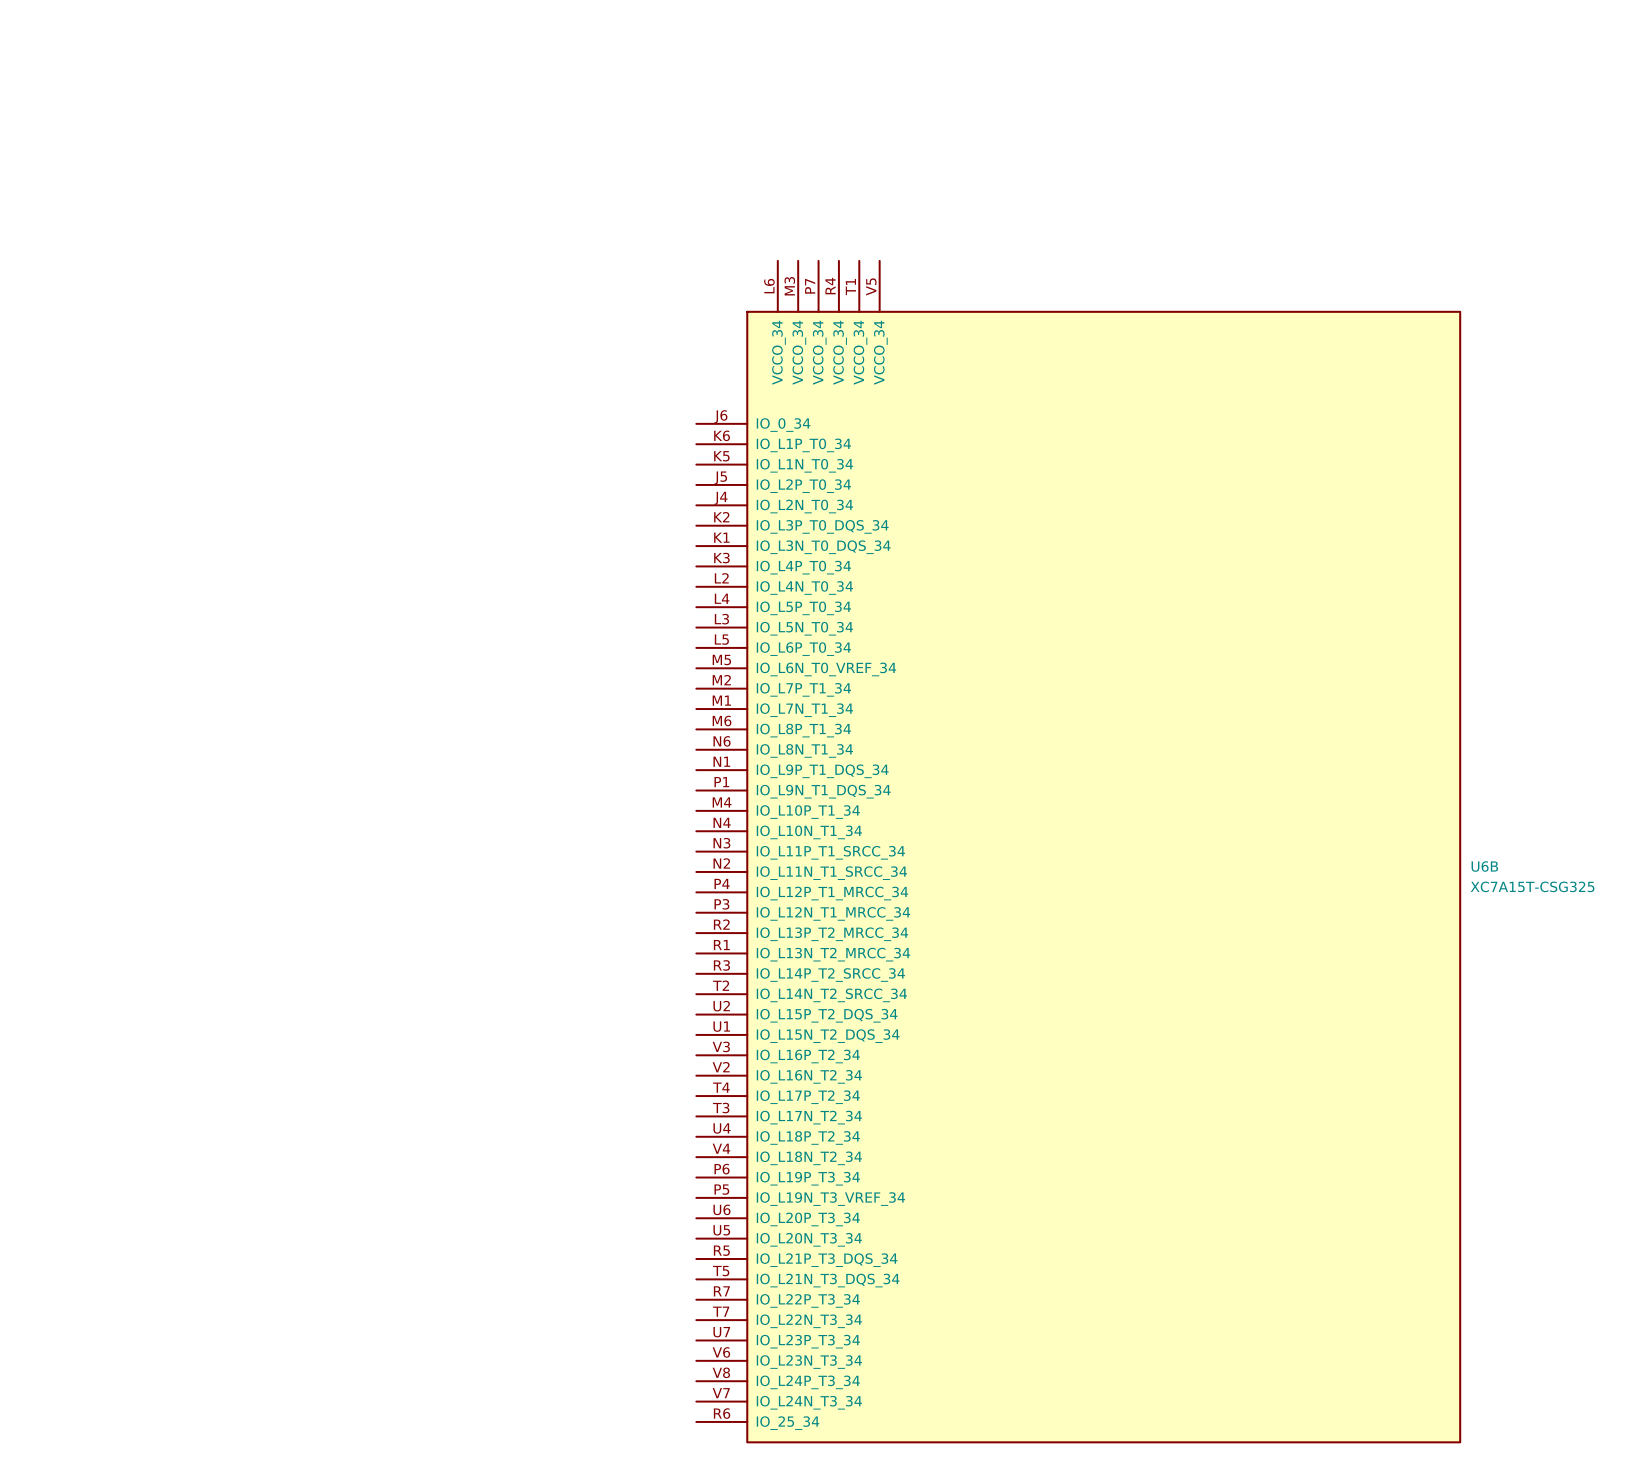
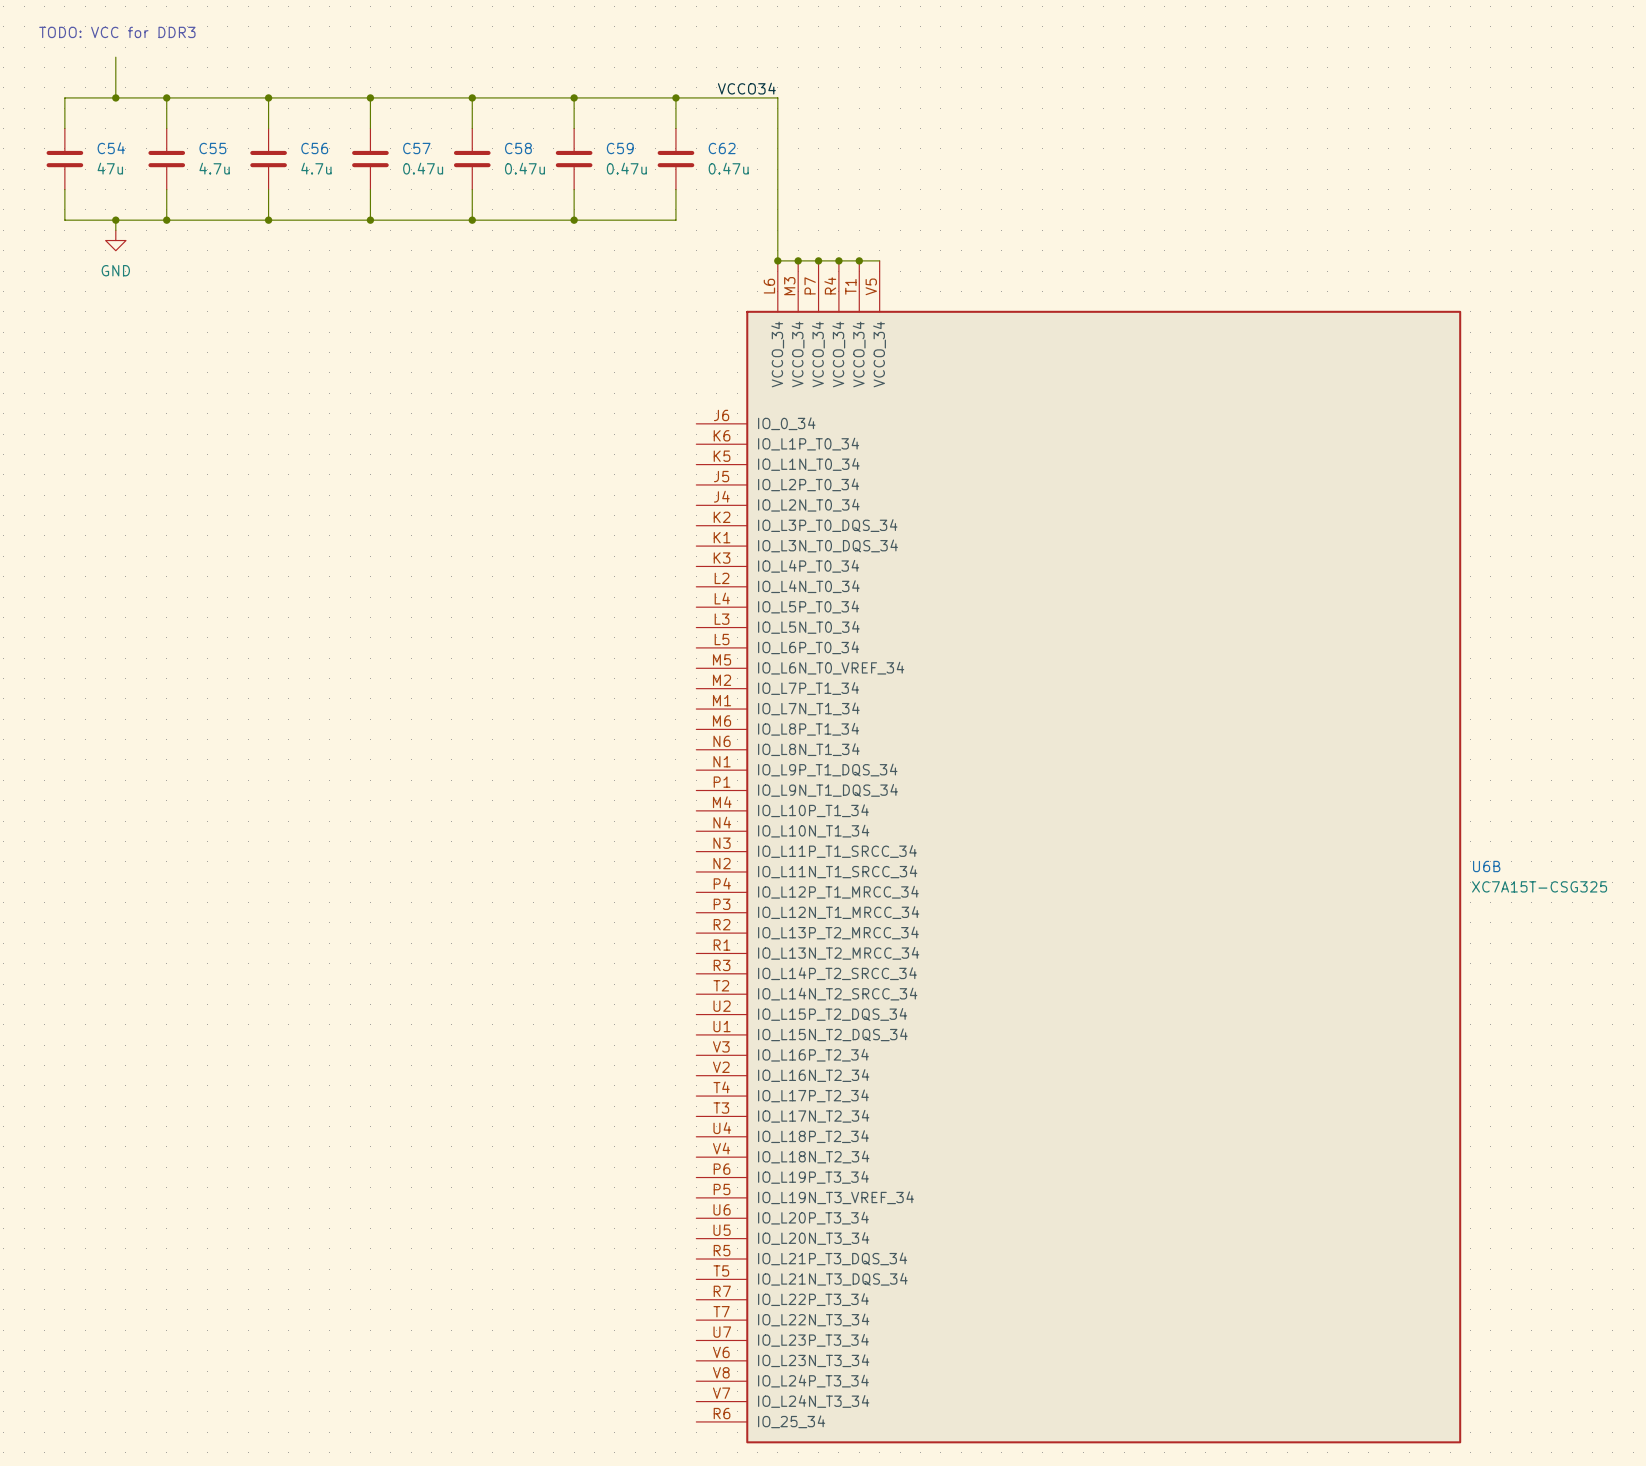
text: none -> TODO: VCC for DDR3 (117, 32)
wire: none -> (115, 57) (115, 97)
label: none -> VCCO34 (746, 88)
junction: none -> (115, 97)
wire: none -> (166, 97) (166, 128)
junction: none -> (166, 97)
wire: none -> (268, 97) (268, 128)
junction: none -> (268, 97)
wire: none -> (370, 97) (370, 128)
junction: none -> (370, 97)
wire: none -> (472, 97) (472, 128)
junction: none -> (472, 97)
wire: none -> (574, 97) (574, 128)
junction: none -> (574, 97)
wire: none -> (675, 97) (675, 128)
junction: none -> (675, 97)
wire: none -> (64, 128) (64, 97) (777, 97) (777, 260) (879, 260)
C54: none -> 47u (64, 159)
C55: none -> 4.7u (166, 159)
C56: none -> 4.7u (268, 159)
C57: none -> 0.47u (370, 159)
C58: none -> 0.47u (472, 159)
C59: none -> 0.47u (574, 159)
C62: none -> 0.47u (675, 159)
wire: none -> (64, 189) (64, 220) (675, 220) (675, 189)
wire: none -> (166, 189) (166, 220)
wire: none -> (268, 189) (268, 220)
wire: none -> (370, 189) (370, 220)
wire: none -> (472, 189) (472, 220)
wire: none -> (574, 189) (574, 220)
wire: none -> (115, 220) (115, 230)
junction: none -> (115, 220)
junction: none -> (166, 220)
junction: none -> (268, 220)
junction: none -> (370, 220)
junction: none -> (472, 220)
junction: none -> (574, 220)
power symbol: none -> GND (115, 240)
junction: none -> (777, 260)
junction: none -> (798, 260)
junction: none -> (818, 260)
junction: none -> (838, 260)
junction: none -> (859, 260)

